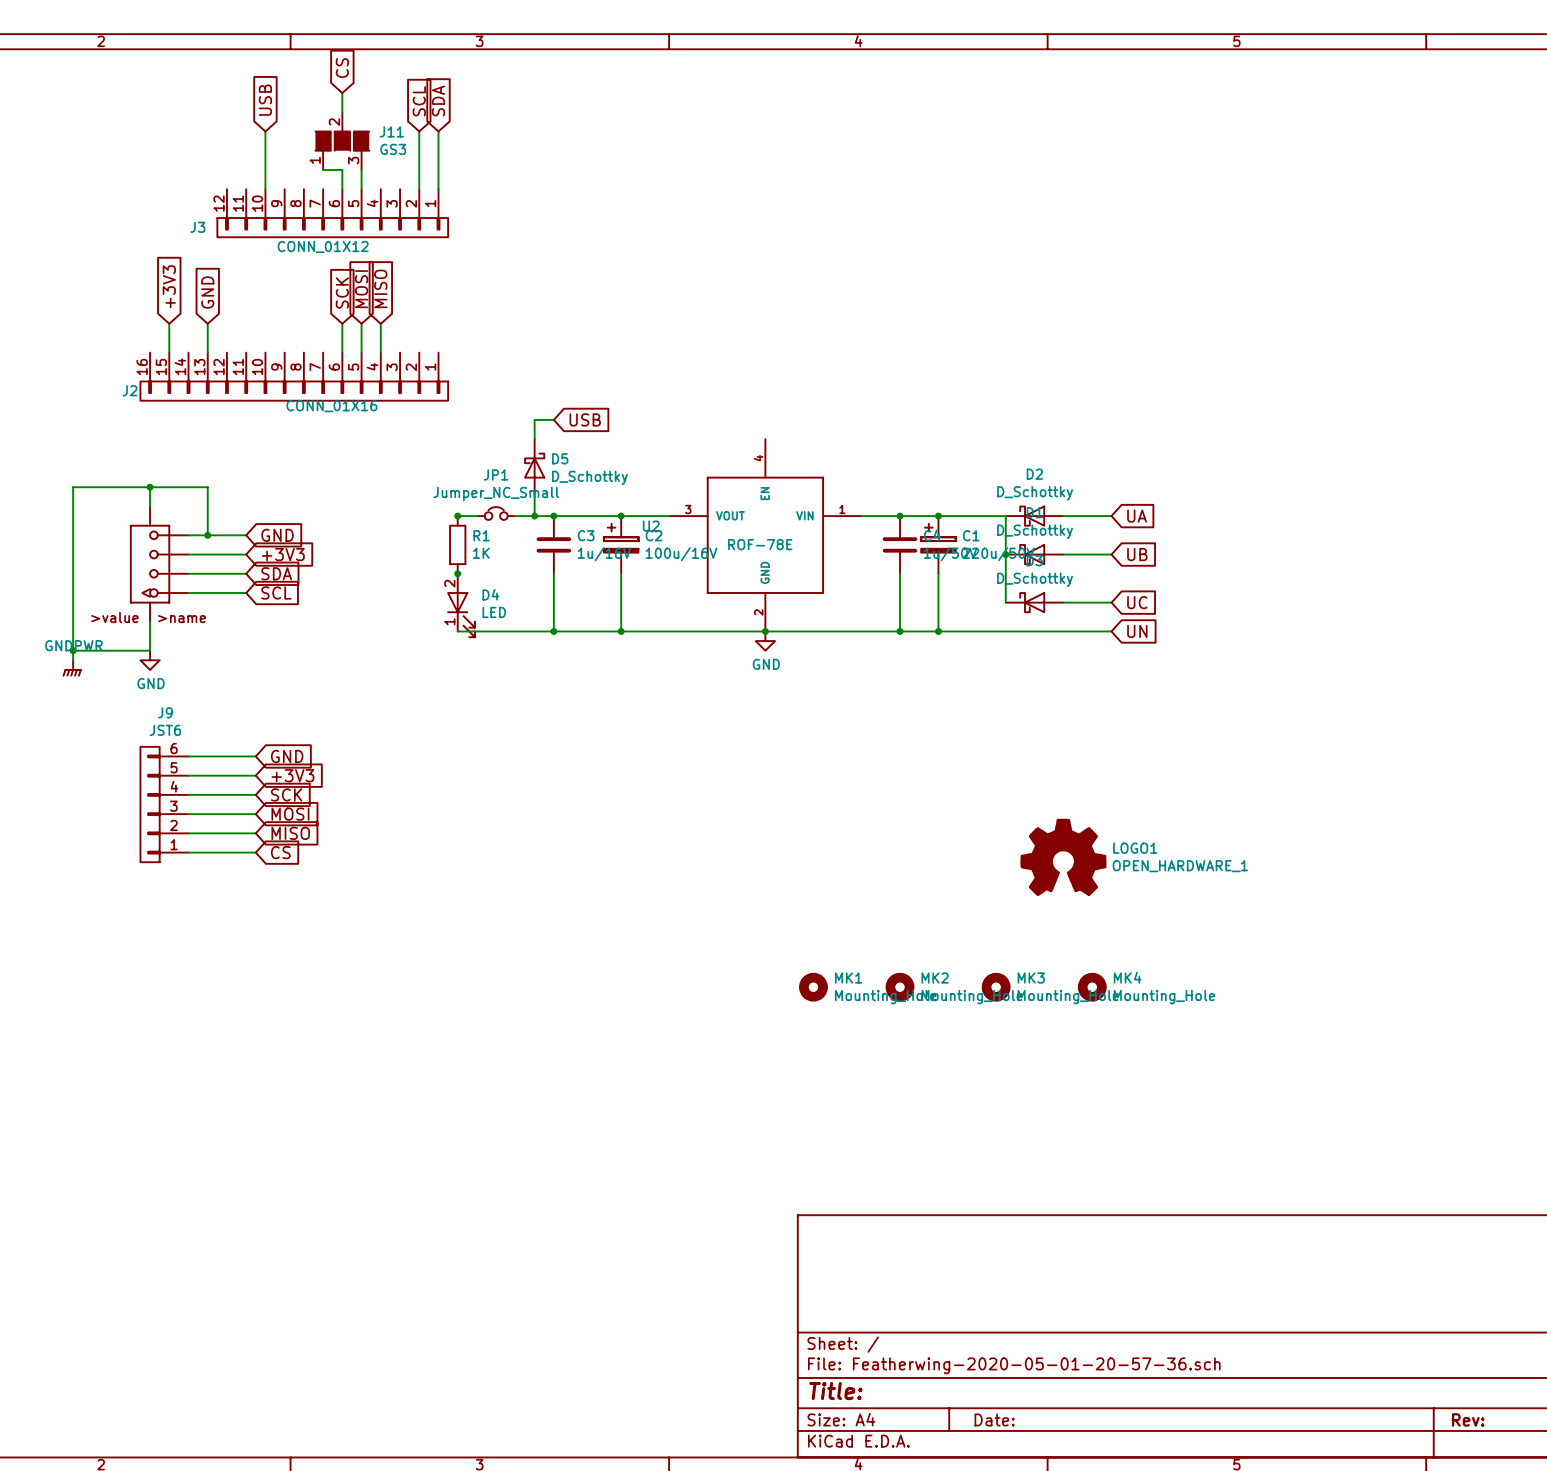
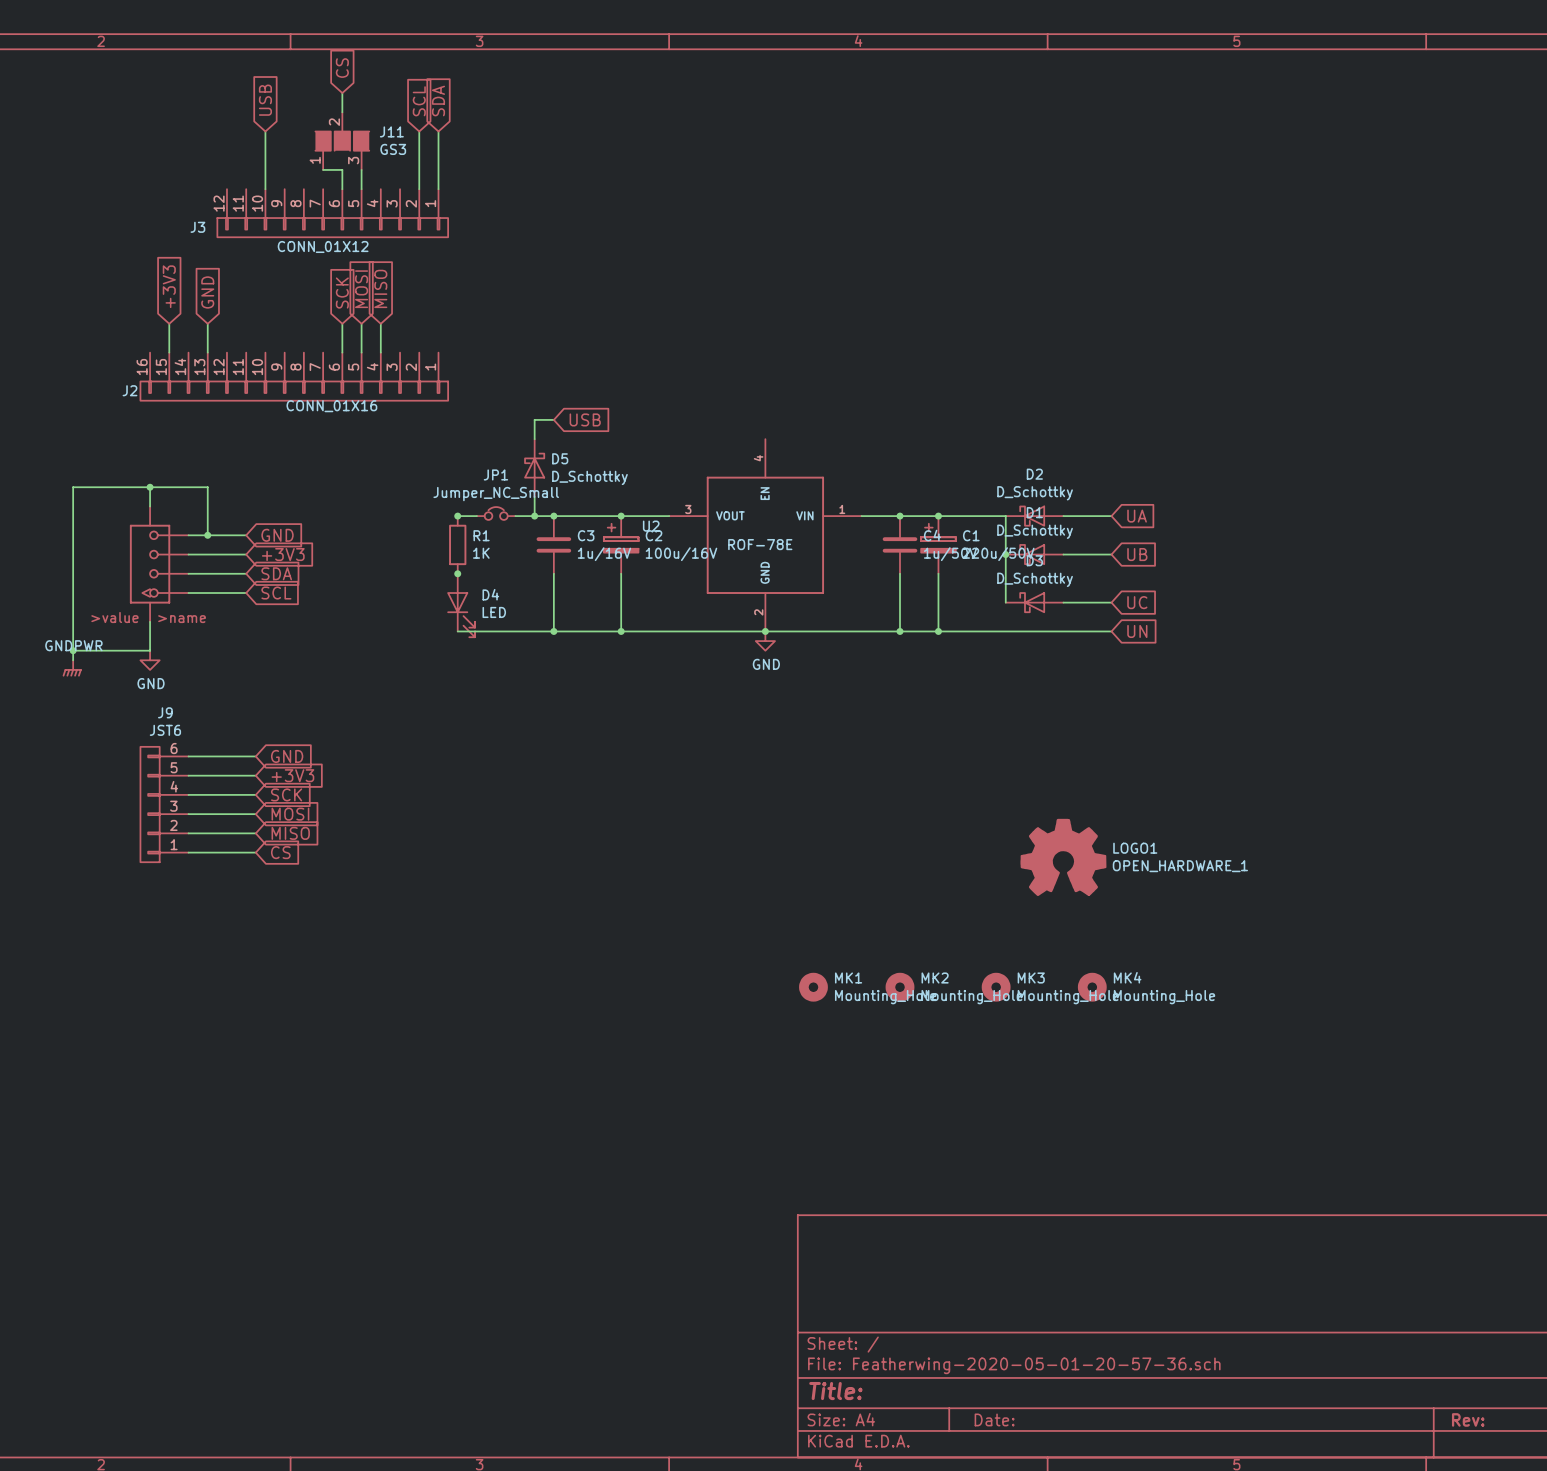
D4 pin number: 2 (449, 583) -> none
D4 pin number: 1 (449, 621) -> none

